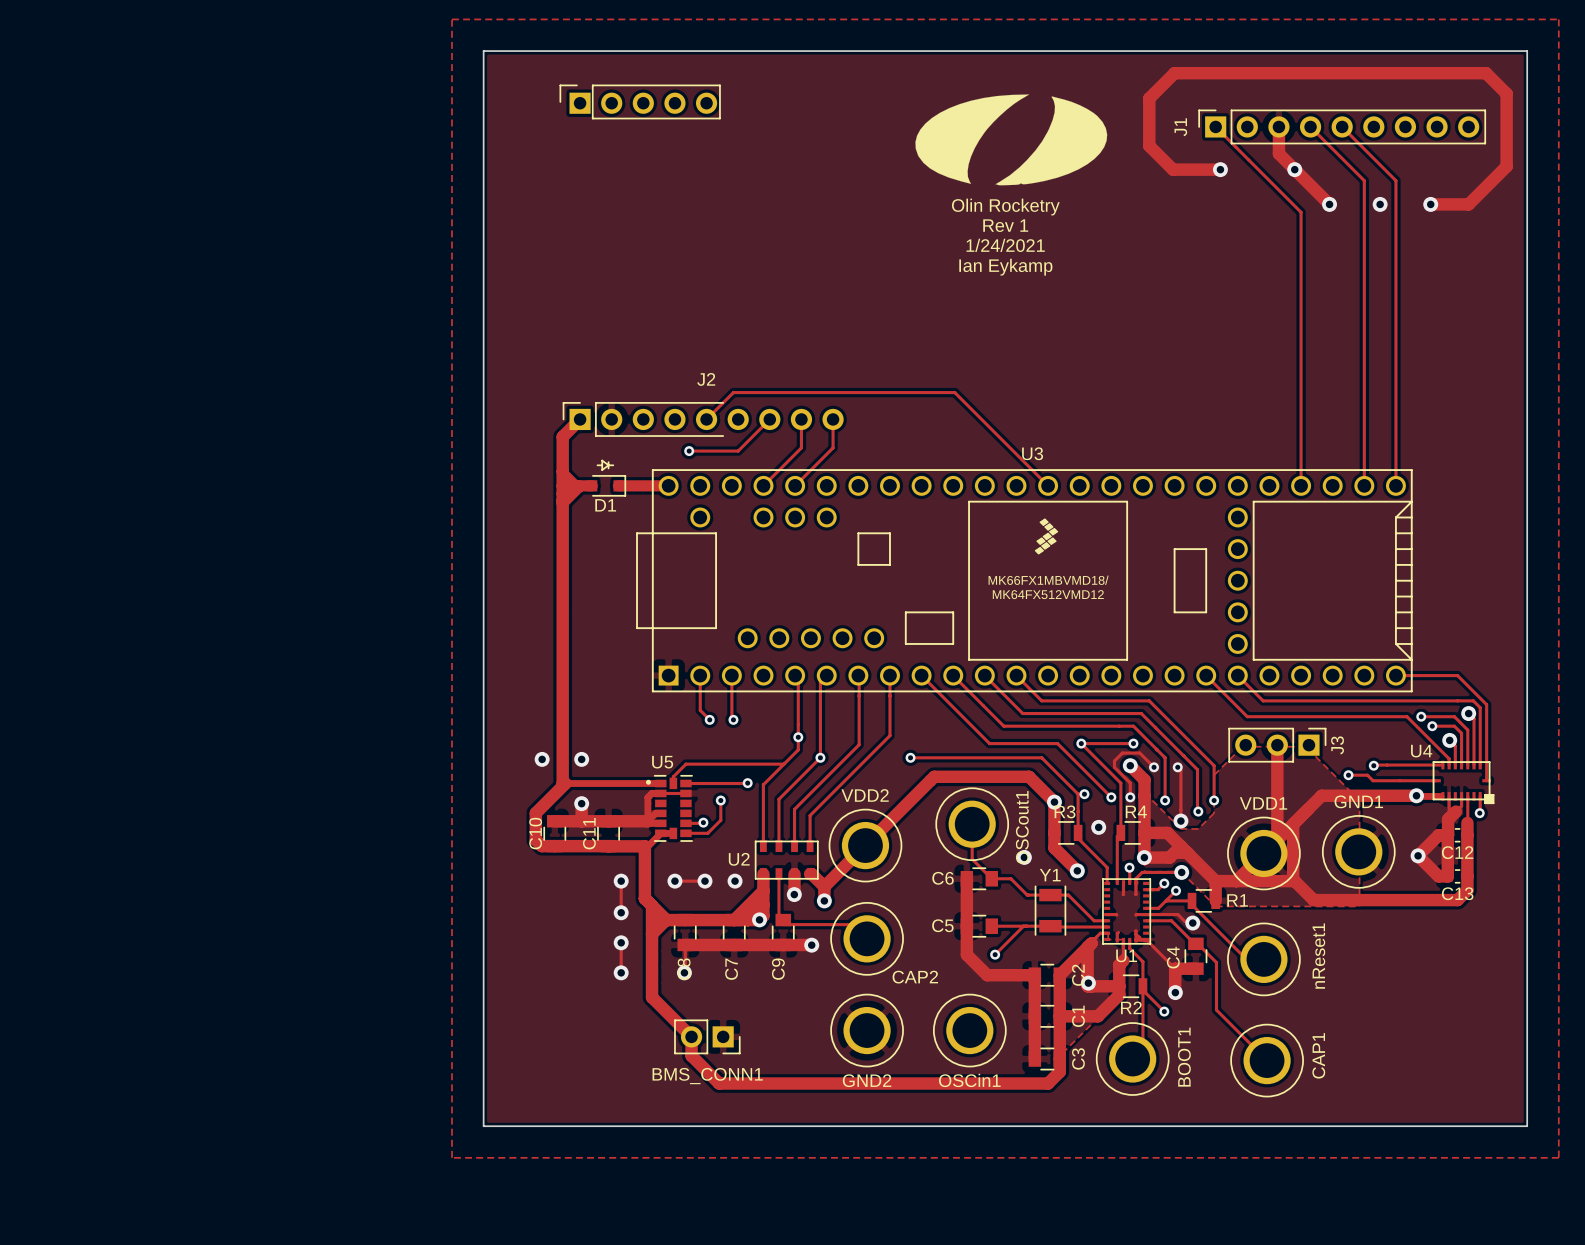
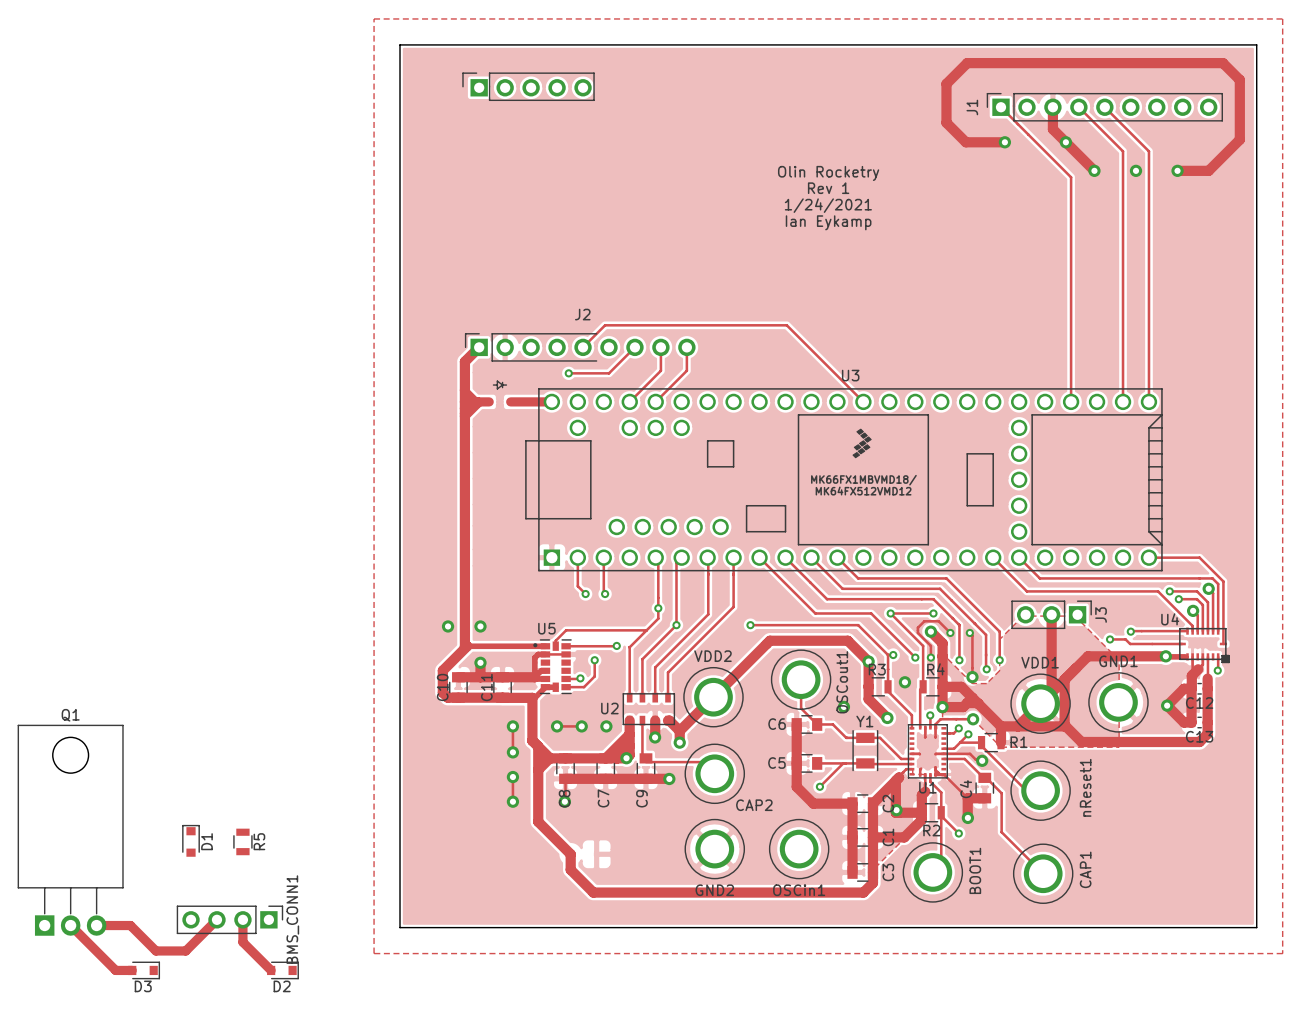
drawing: [915, 94, 1108, 186] -> none
D1 rotation: 0° (606, 485) -> 90° counterclockwise (191, 840)
D1 position: (606, 485) -> (191, 840)
Q1: none -> (70, 830)
BMS_CONN1 footprint: [674, 1019, 741, 1055] -> [176, 905, 284, 935]
R5: none -> (242, 841)
BMS_CONN1 name position: BMS_CONN1 (707, 1076) -> BMS_CONN1 (292, 919)
track: none -> (216, 919) (185, 950) (155, 950) (130, 925) (96, 925)
track: none -> (242, 919) (242, 942) (271, 970)
track: none -> (70, 925) (115, 970) (132, 970)
D3: none -> (144, 970)
D2: none -> (282, 970)

